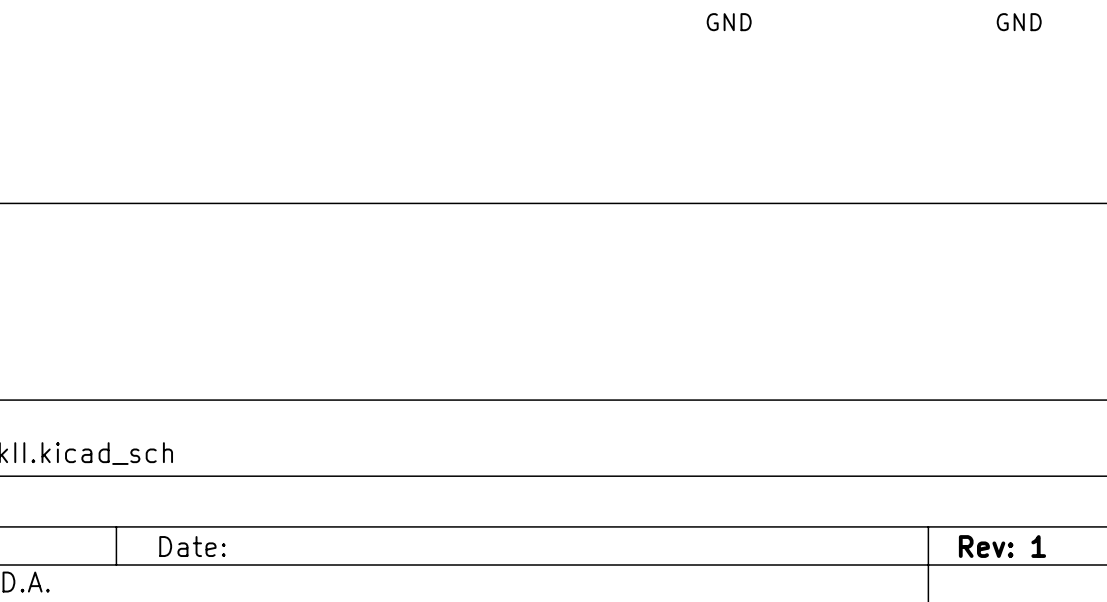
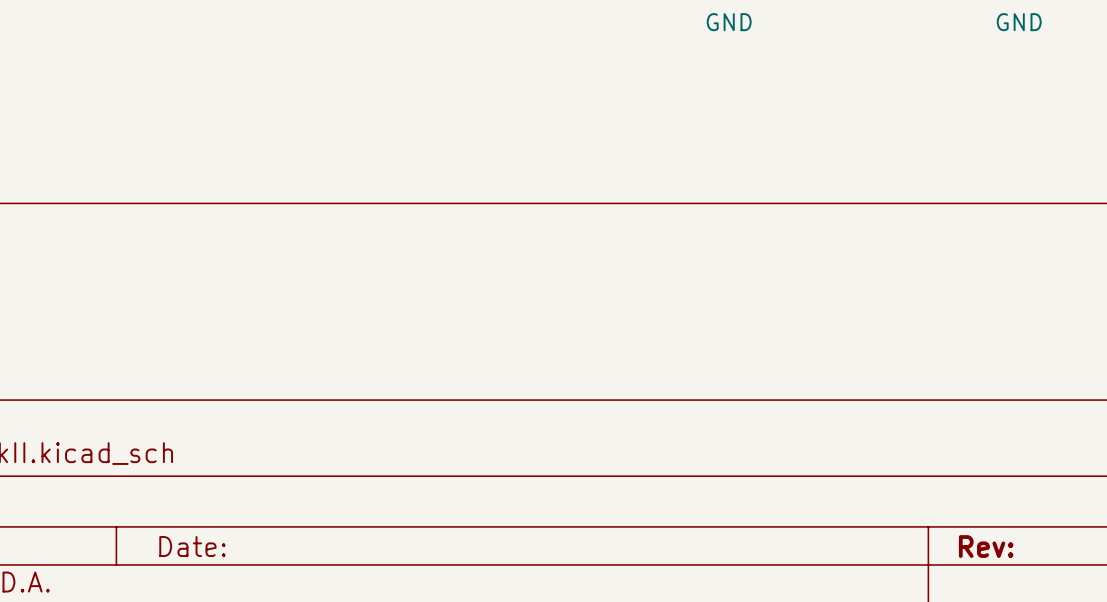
title block: Rev: 1 (1002, 546) -> Rev: (986, 546)

